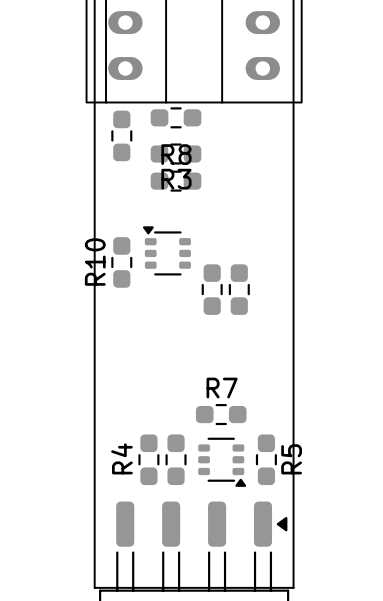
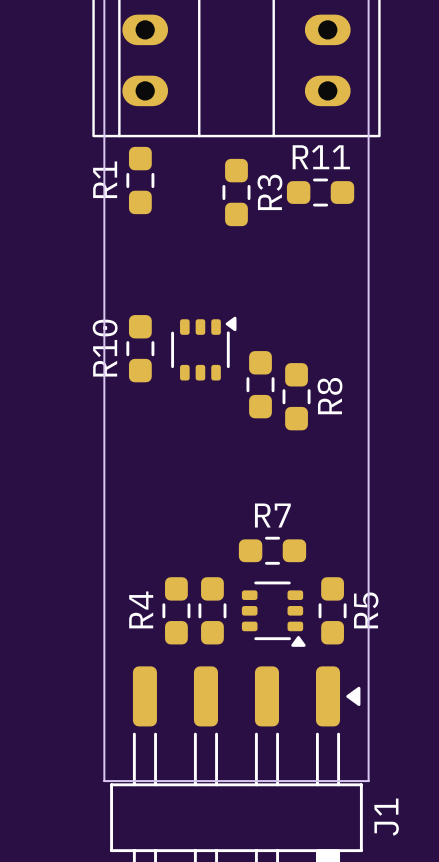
part: (176, 117) -> none
R1 name: none -> R1 (105, 179)
R11: none -> (320, 192)
R3 rotation: 0° (176, 154) -> 90° clockwise (236, 192)
R3 name position: R3 (176, 179) -> R3 (269, 192)
R8 rotation: 0° (176, 181) -> 90° clockwise (296, 396)
R8 position: (176, 181) -> (296, 396)
part rotation: 0° (166, 250) -> 90° clockwise (203, 348)
part: (239, 289) -> none

